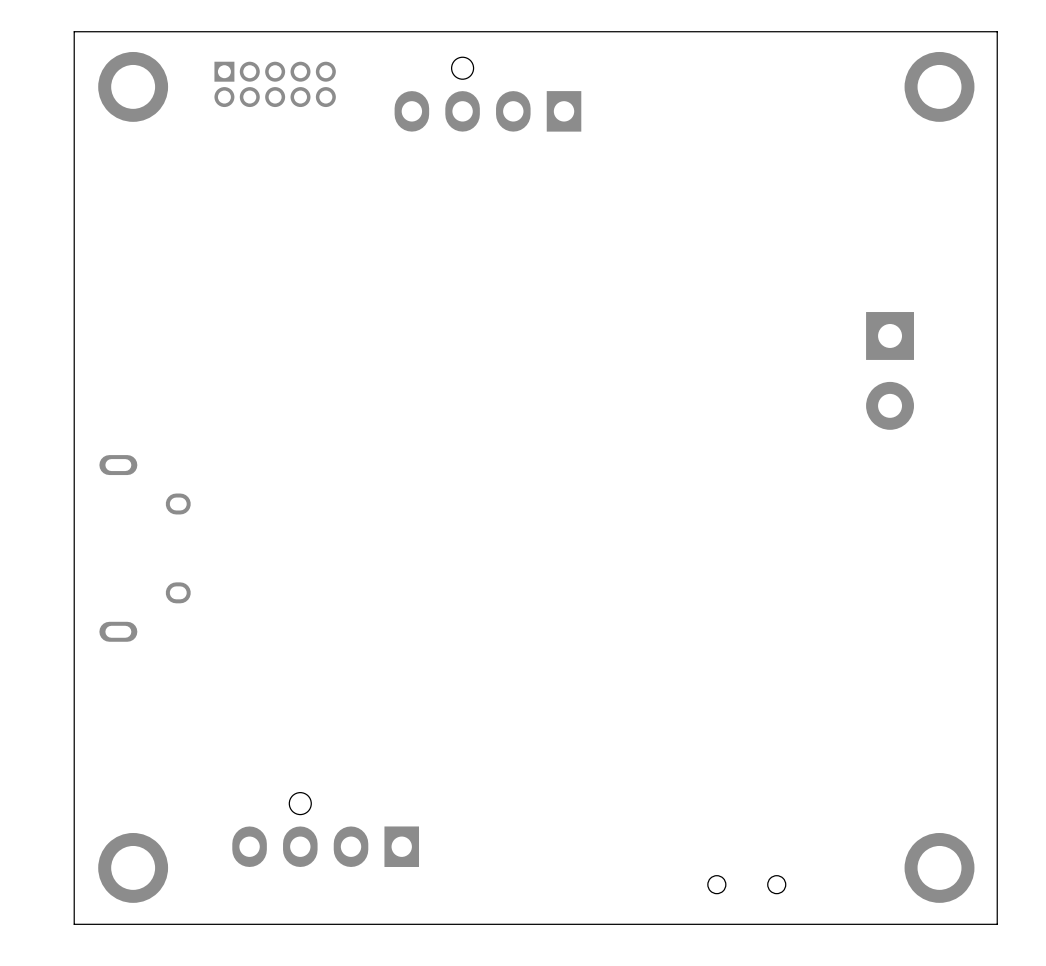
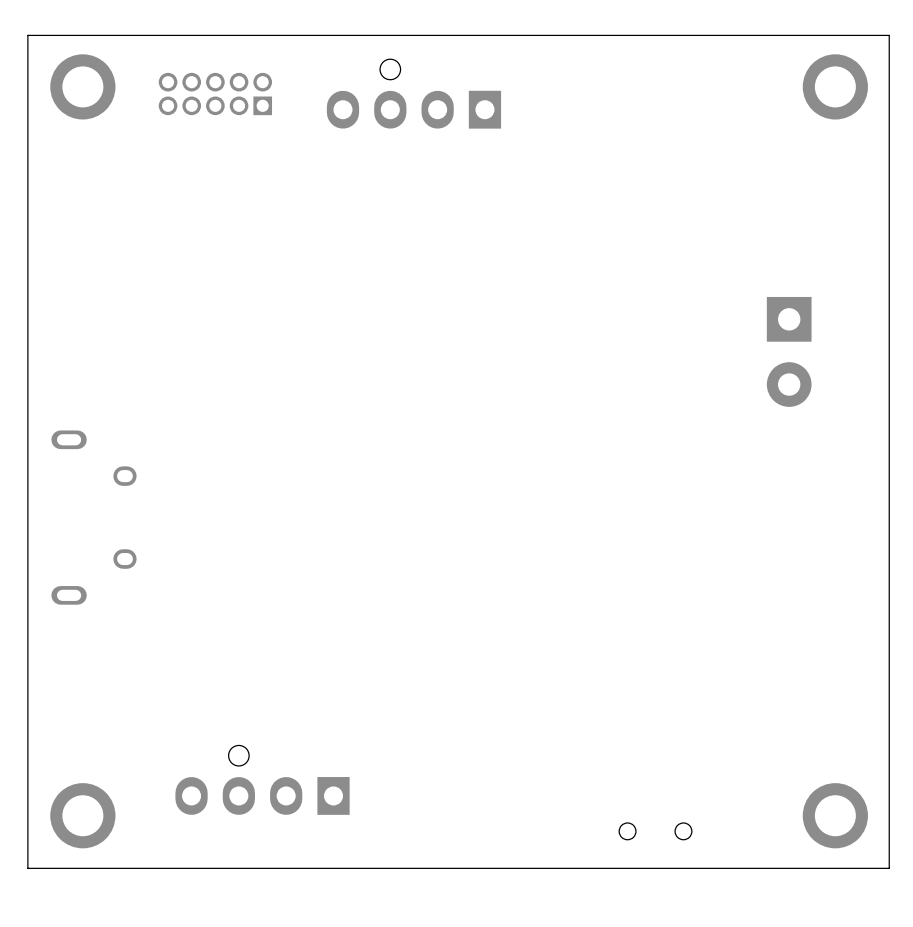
part rotation: 0° (275, 84) -> 180° (215, 94)

